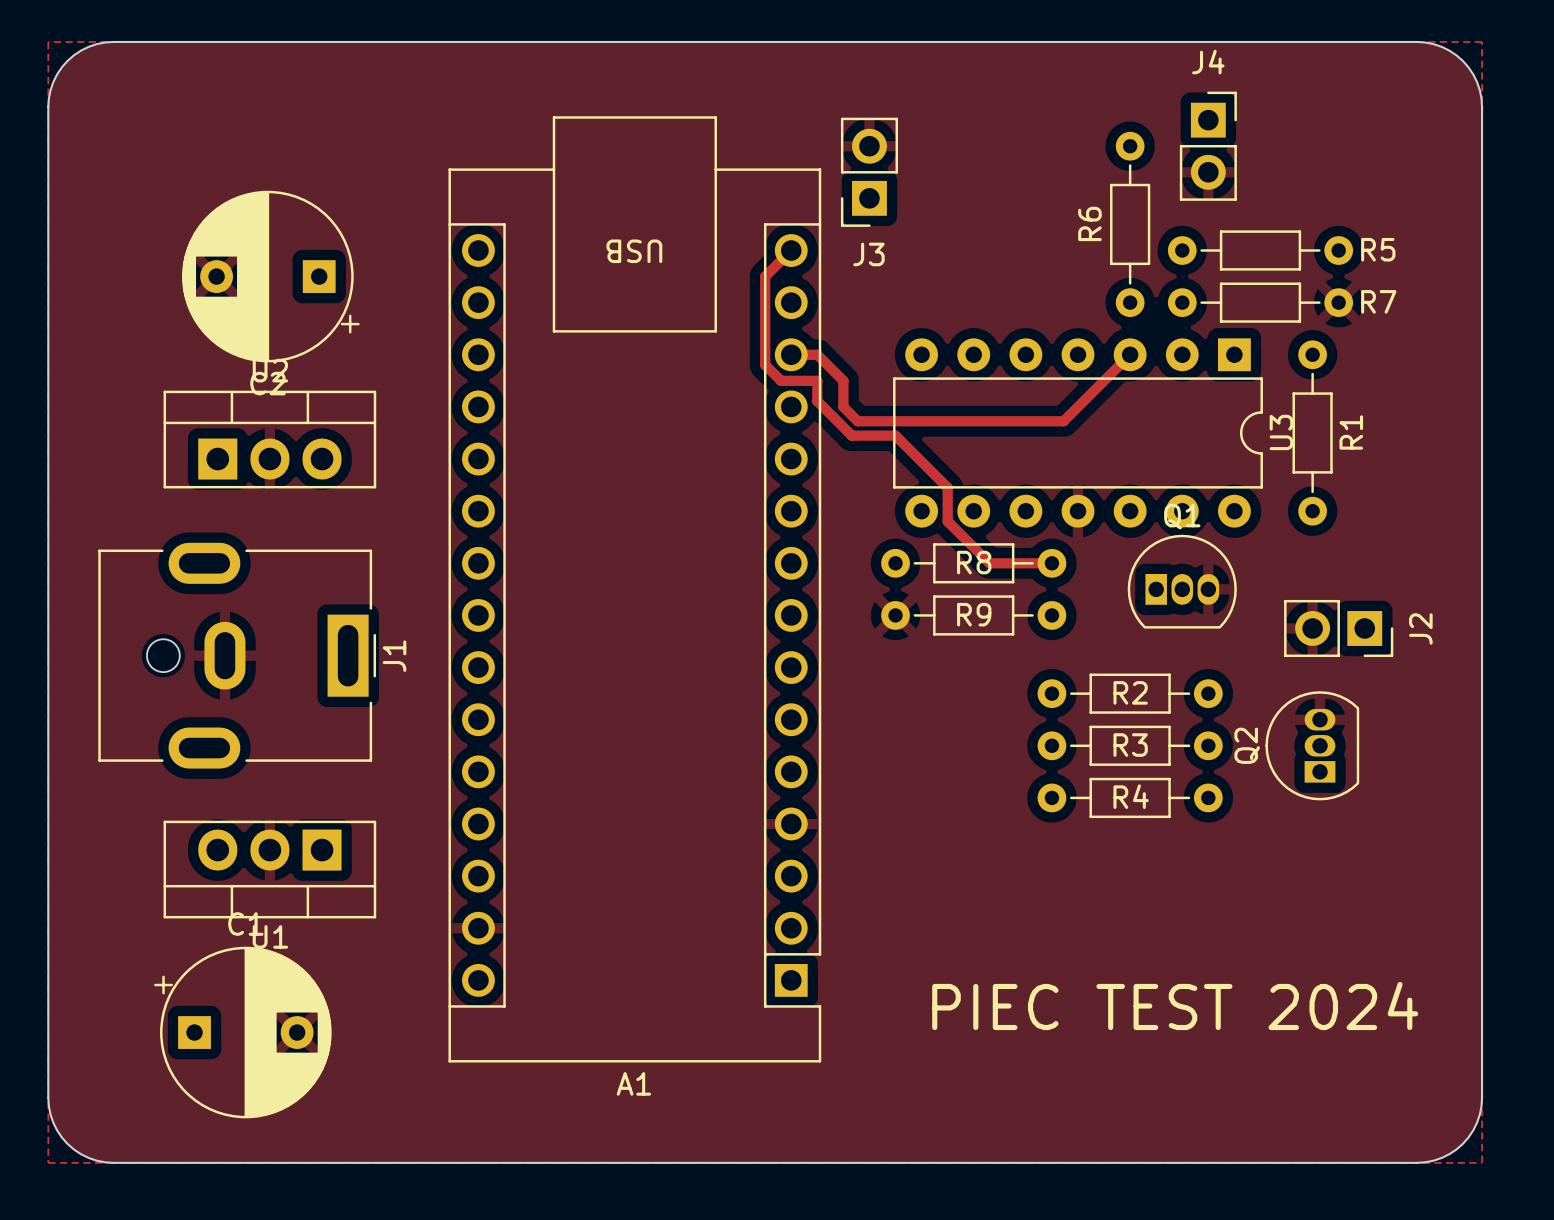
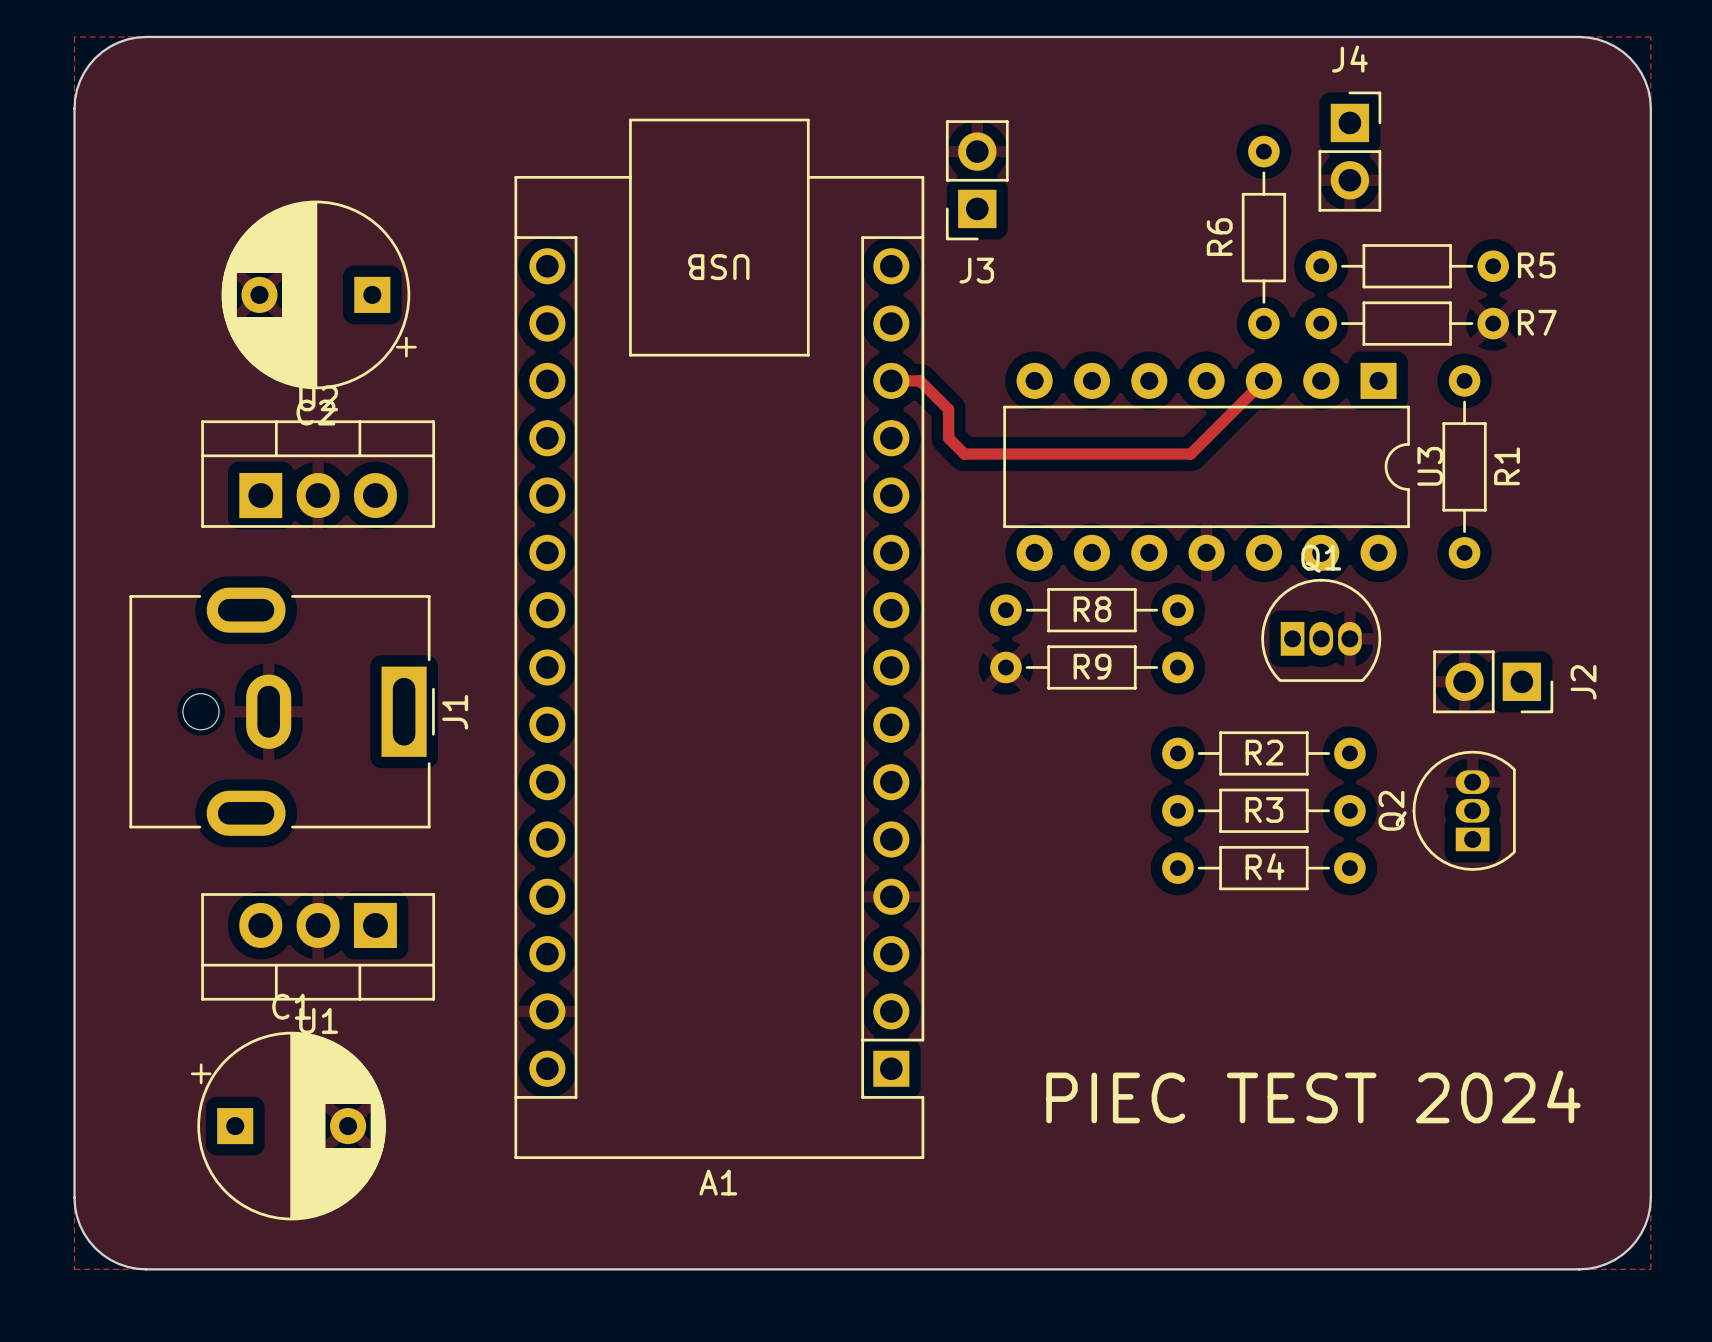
track: (791, 250) (765, 276) (765, 364) (781, 380) (817, 380) (817, 401) (851, 435) (895, 435) (947, 487) (947, 521) (989, 563) (1051, 563) -> none

